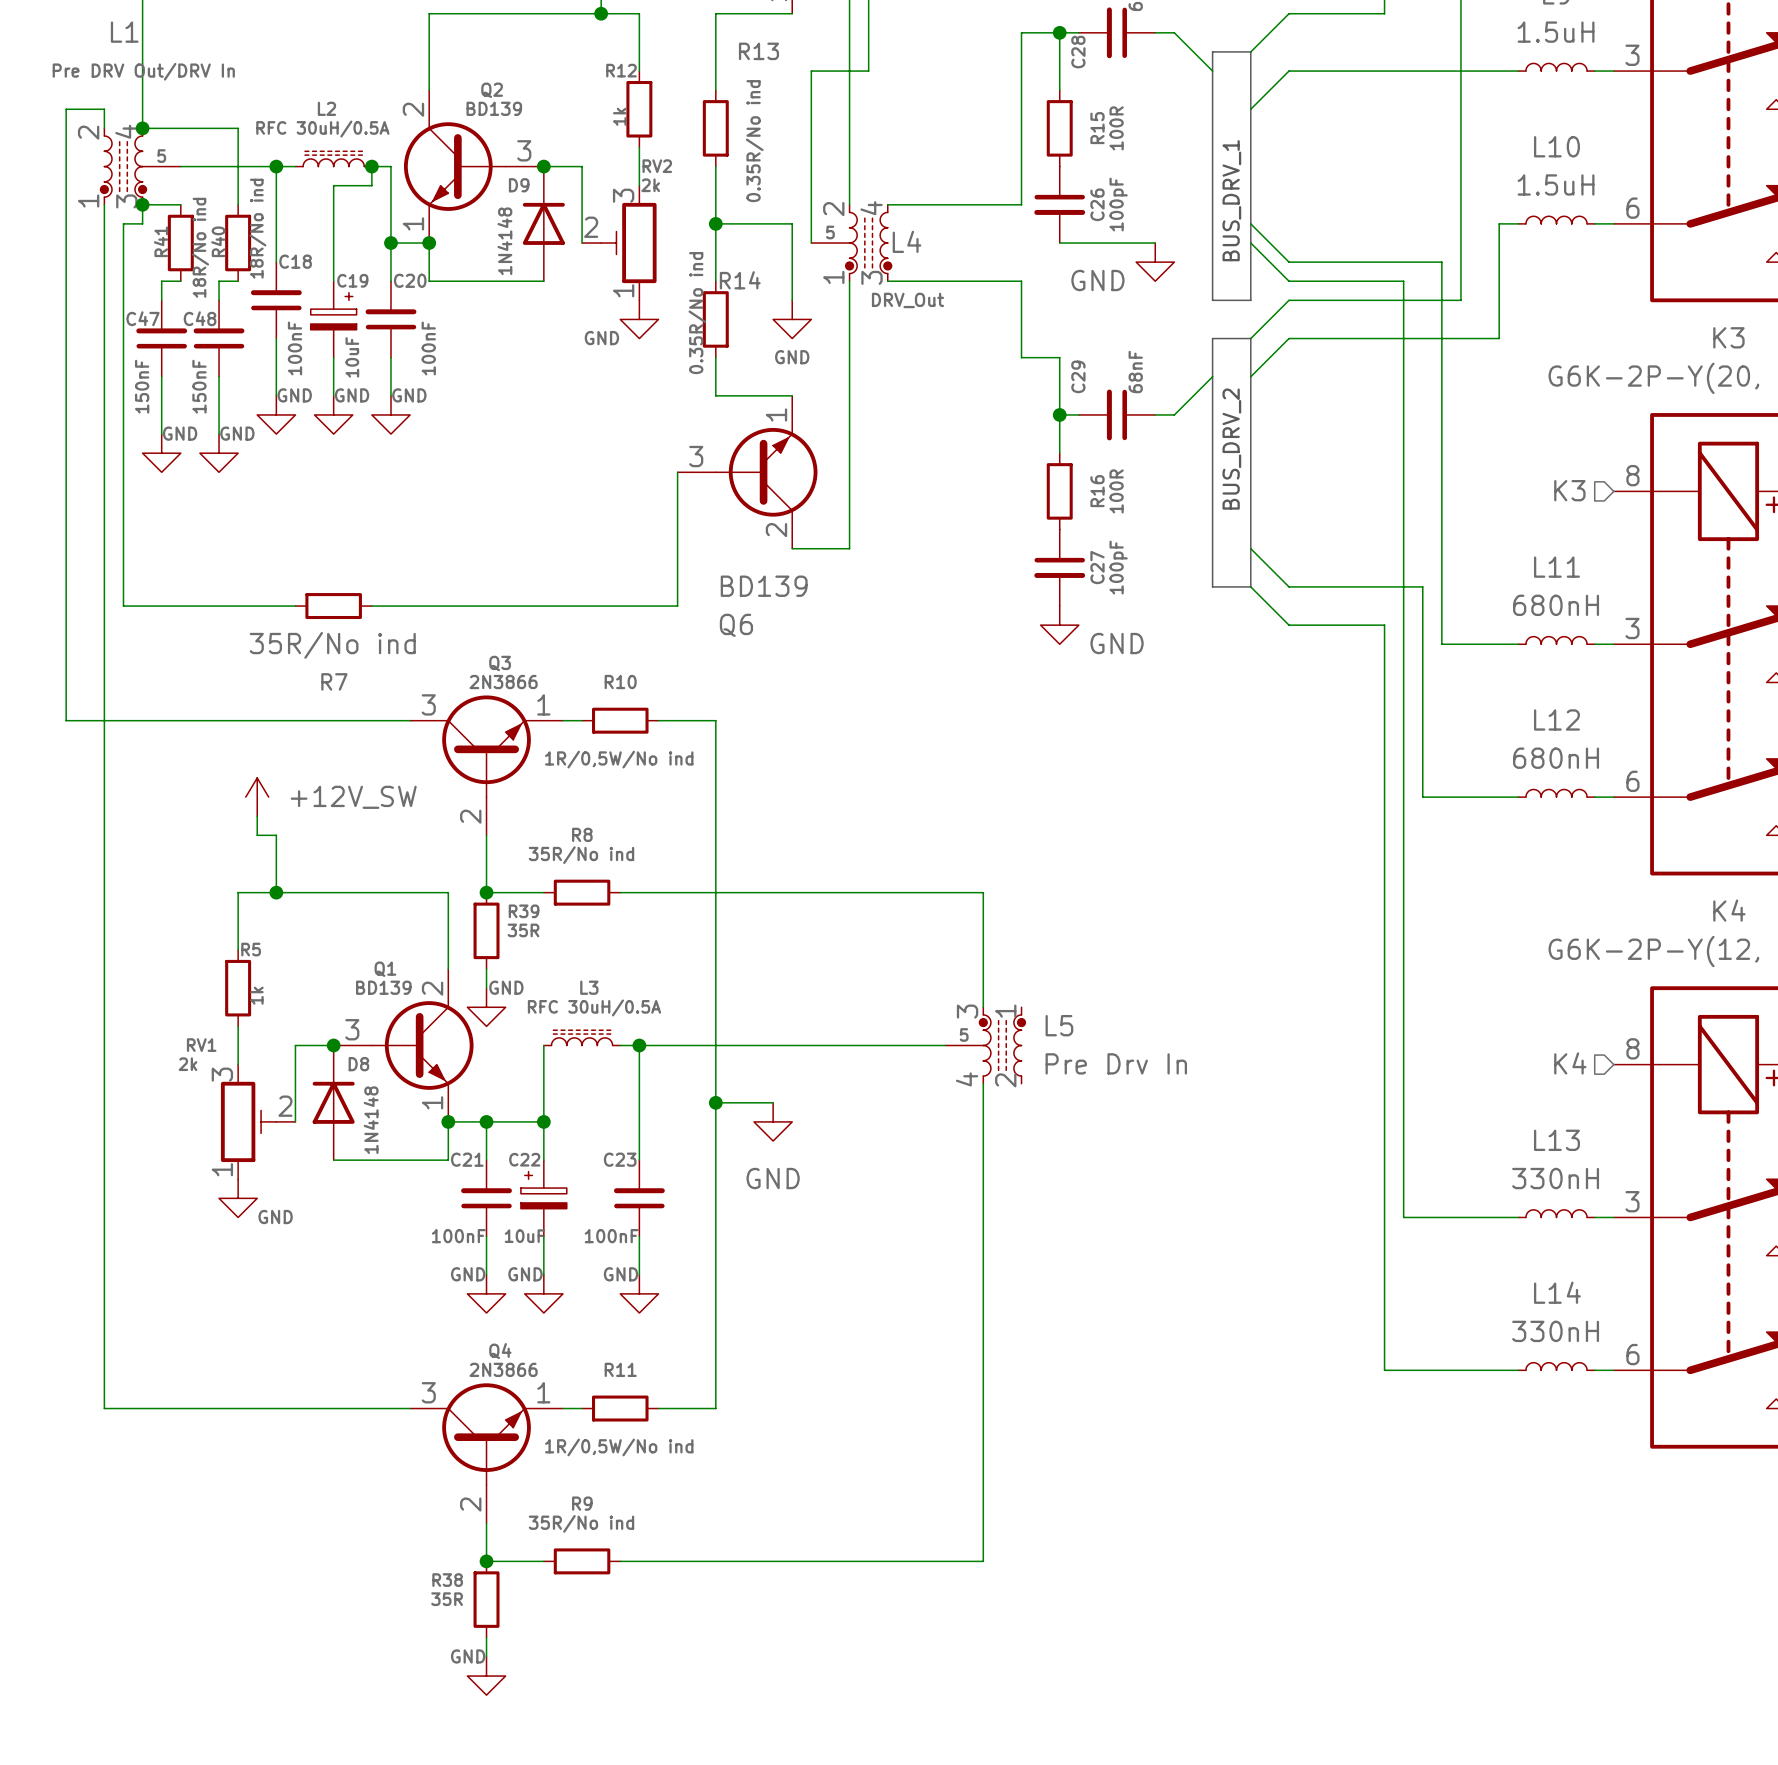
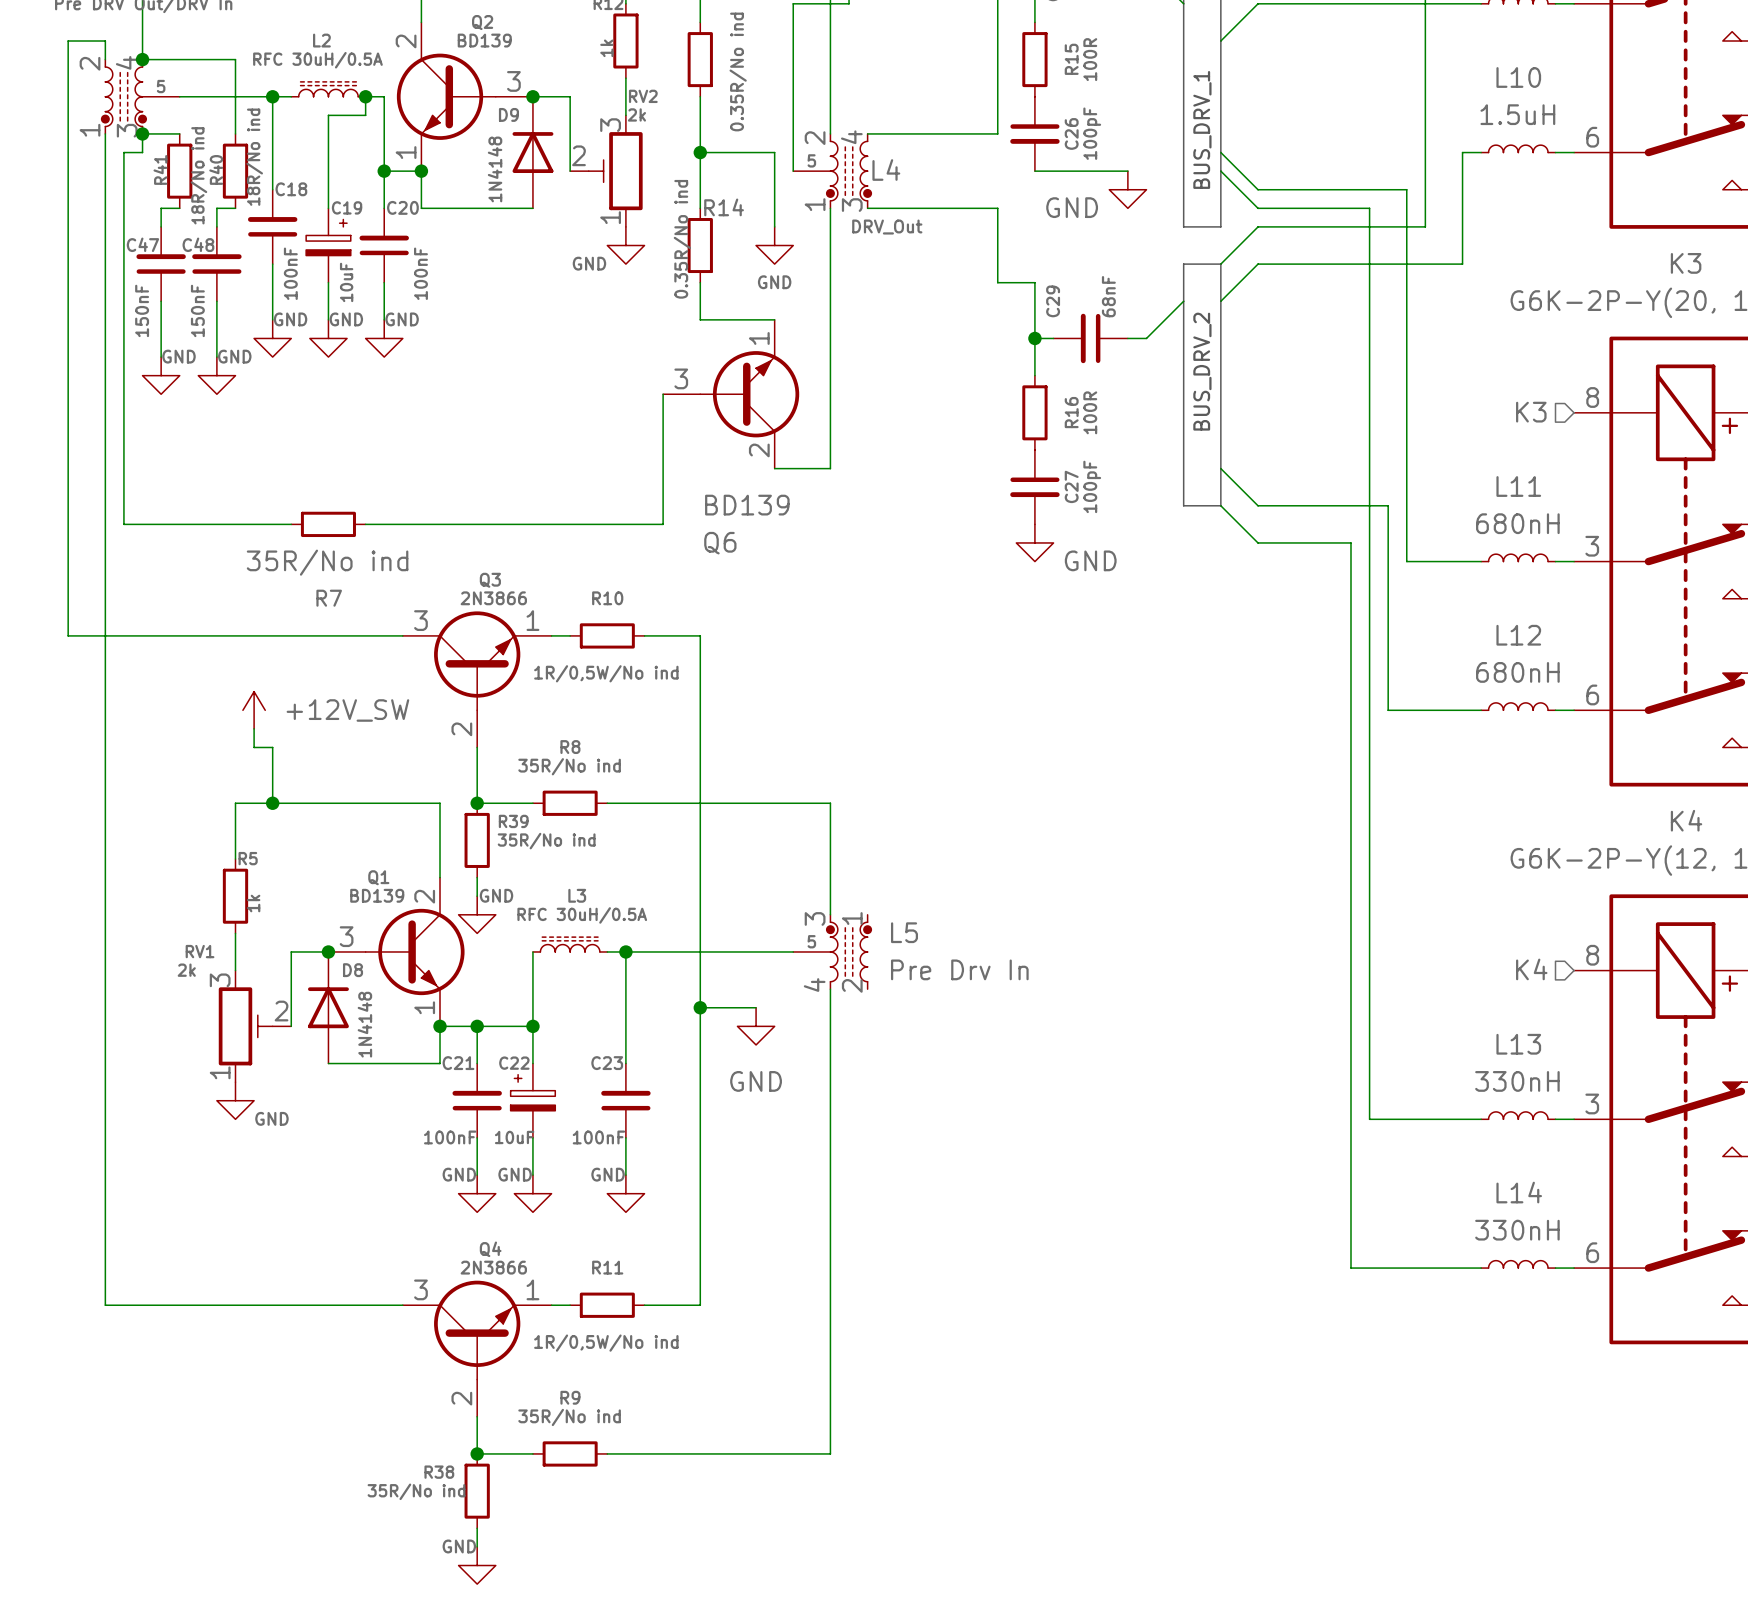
wire: (849, 892) (983, 892) (983, 1007) -> (830, 803) (830, 914)
R39 value: 35R (523, 930) -> 35R/No ind (546, 841)
wire: (811, 1045) (945, 1045) -> none
L5 position: (985, 1045) -> (832, 951)
wire: (983, 1083) (983, 1561) (849, 1561) -> (830, 989) (830, 1453)
R38 value: 35R (447, 1599) -> 35R/No ind (416, 1491)

